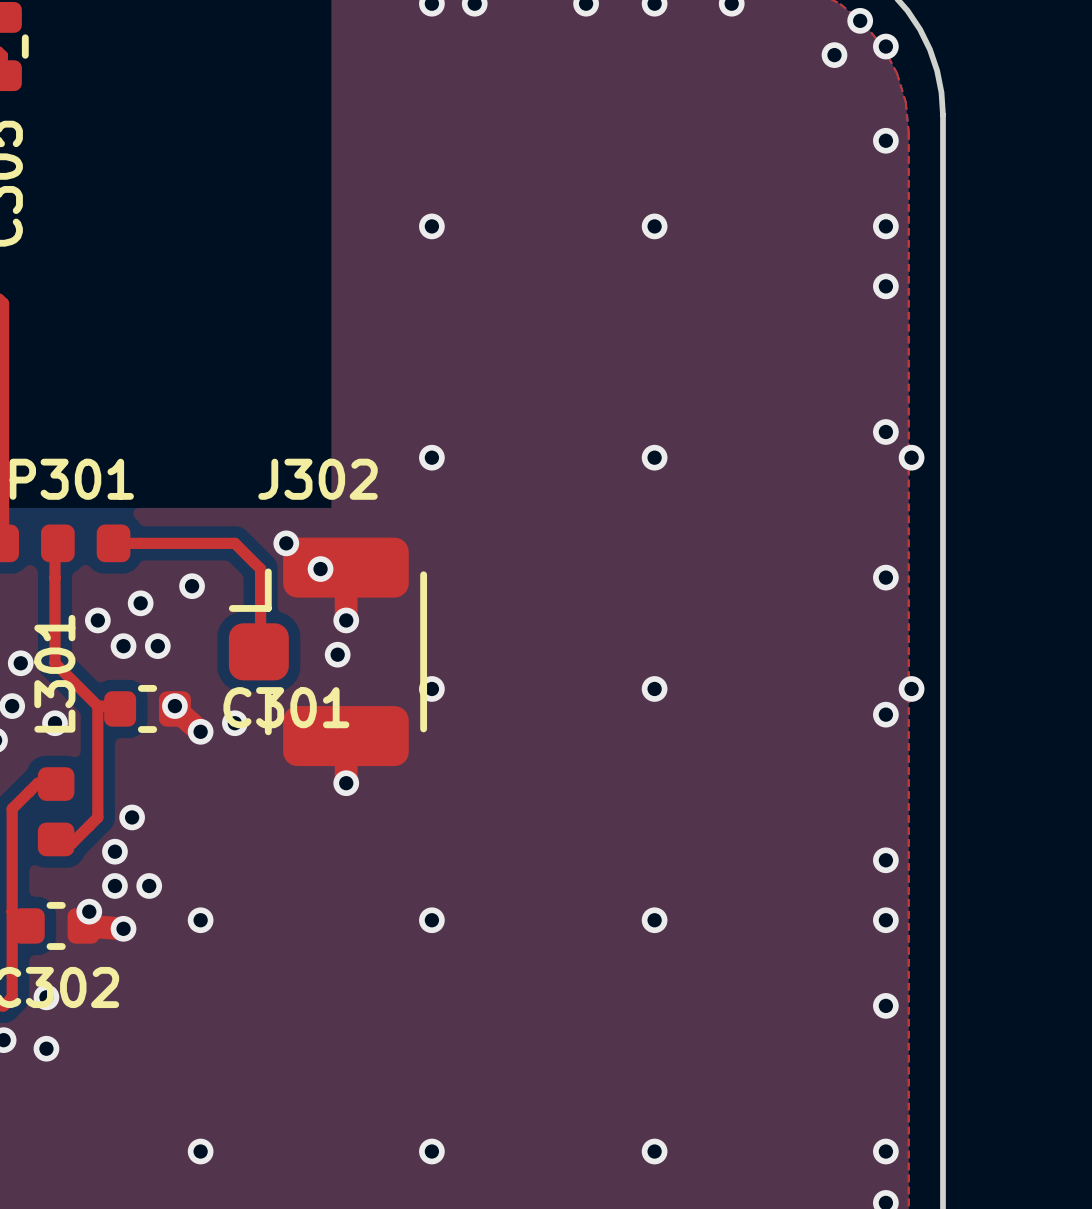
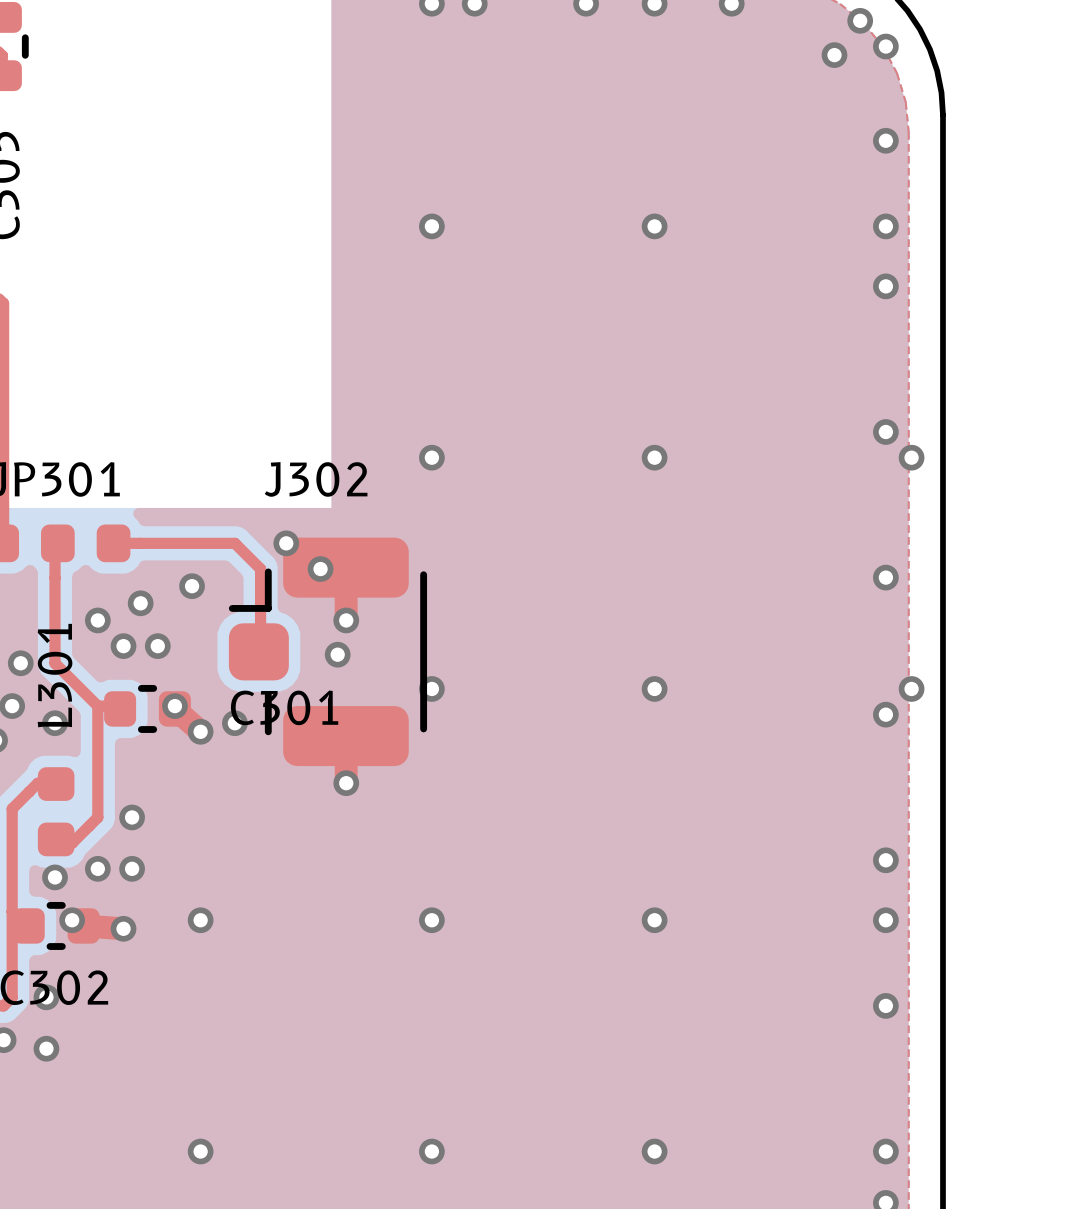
via: (114, 851) -> none
via: none -> (97, 868)
via: none -> (132, 868)
via: none -> (55, 877)
via: (114, 885) -> none
via: (149, 885) -> none
via position: (89, 911) -> (72, 920)

